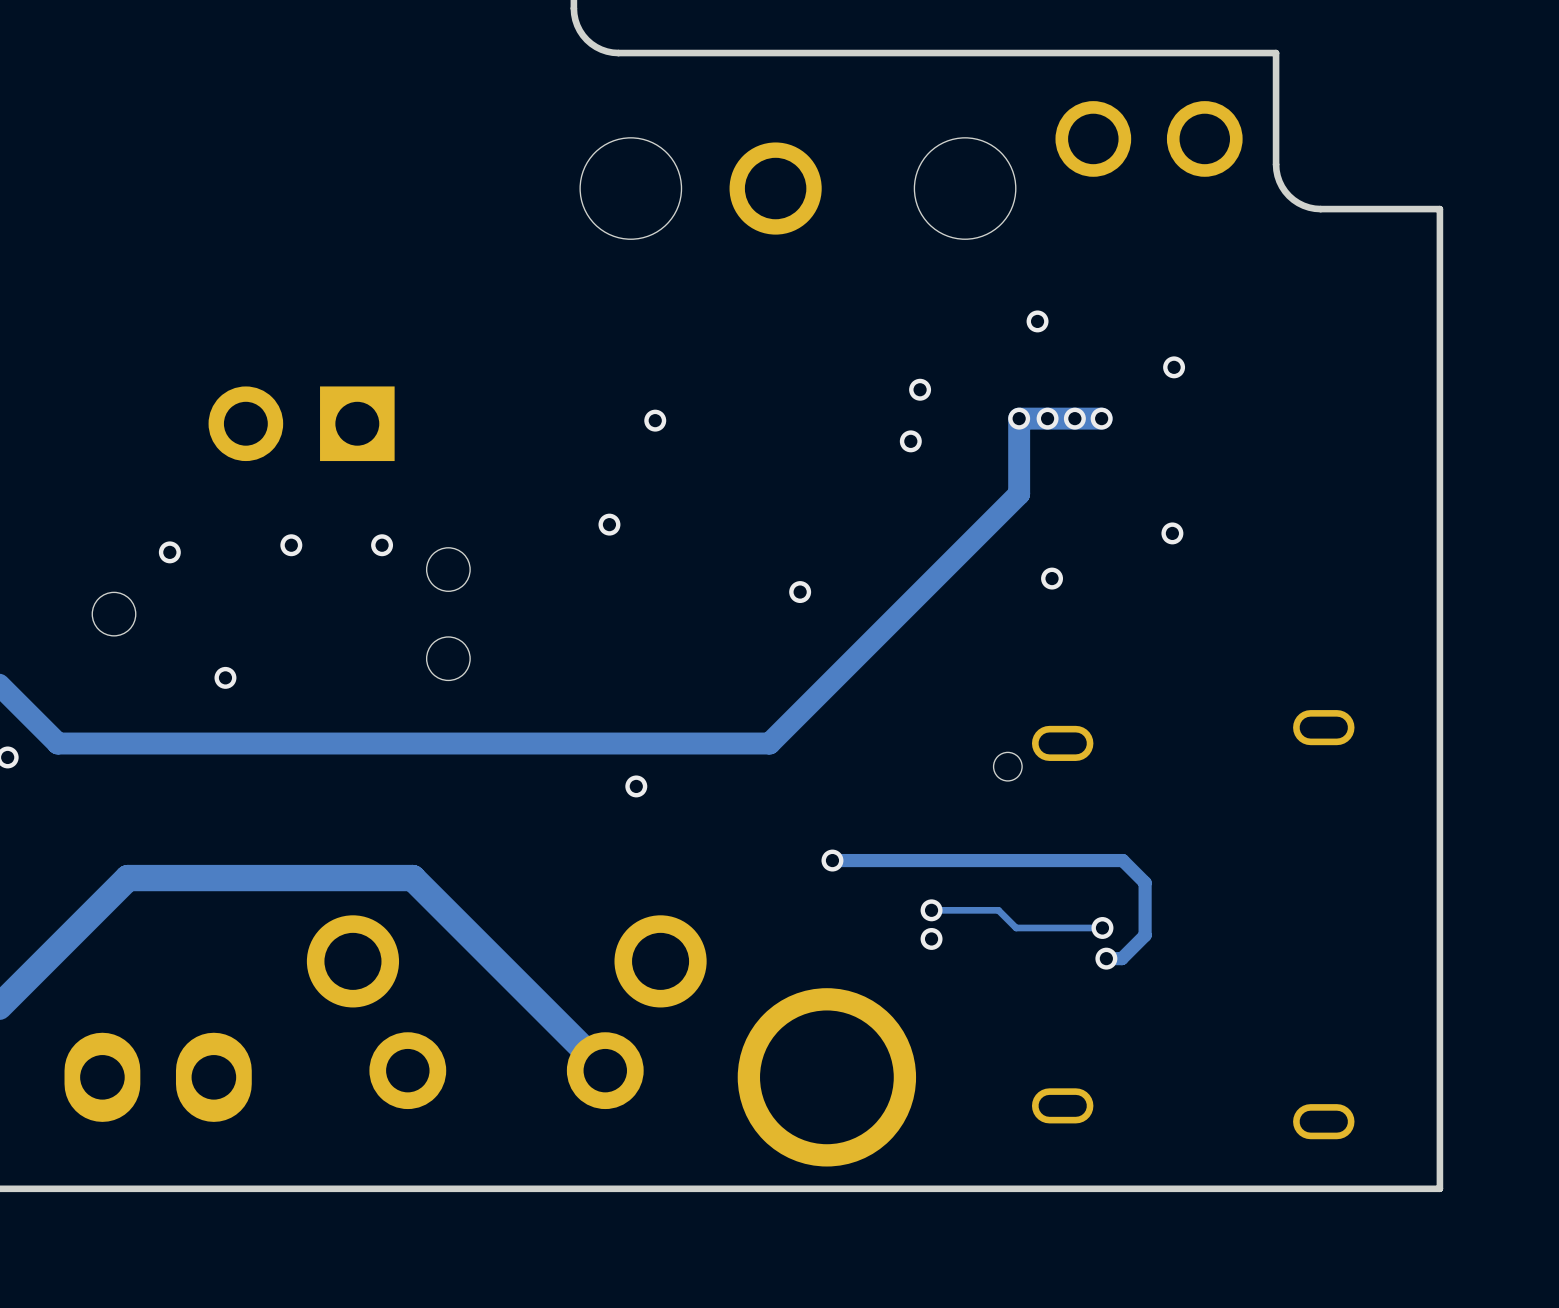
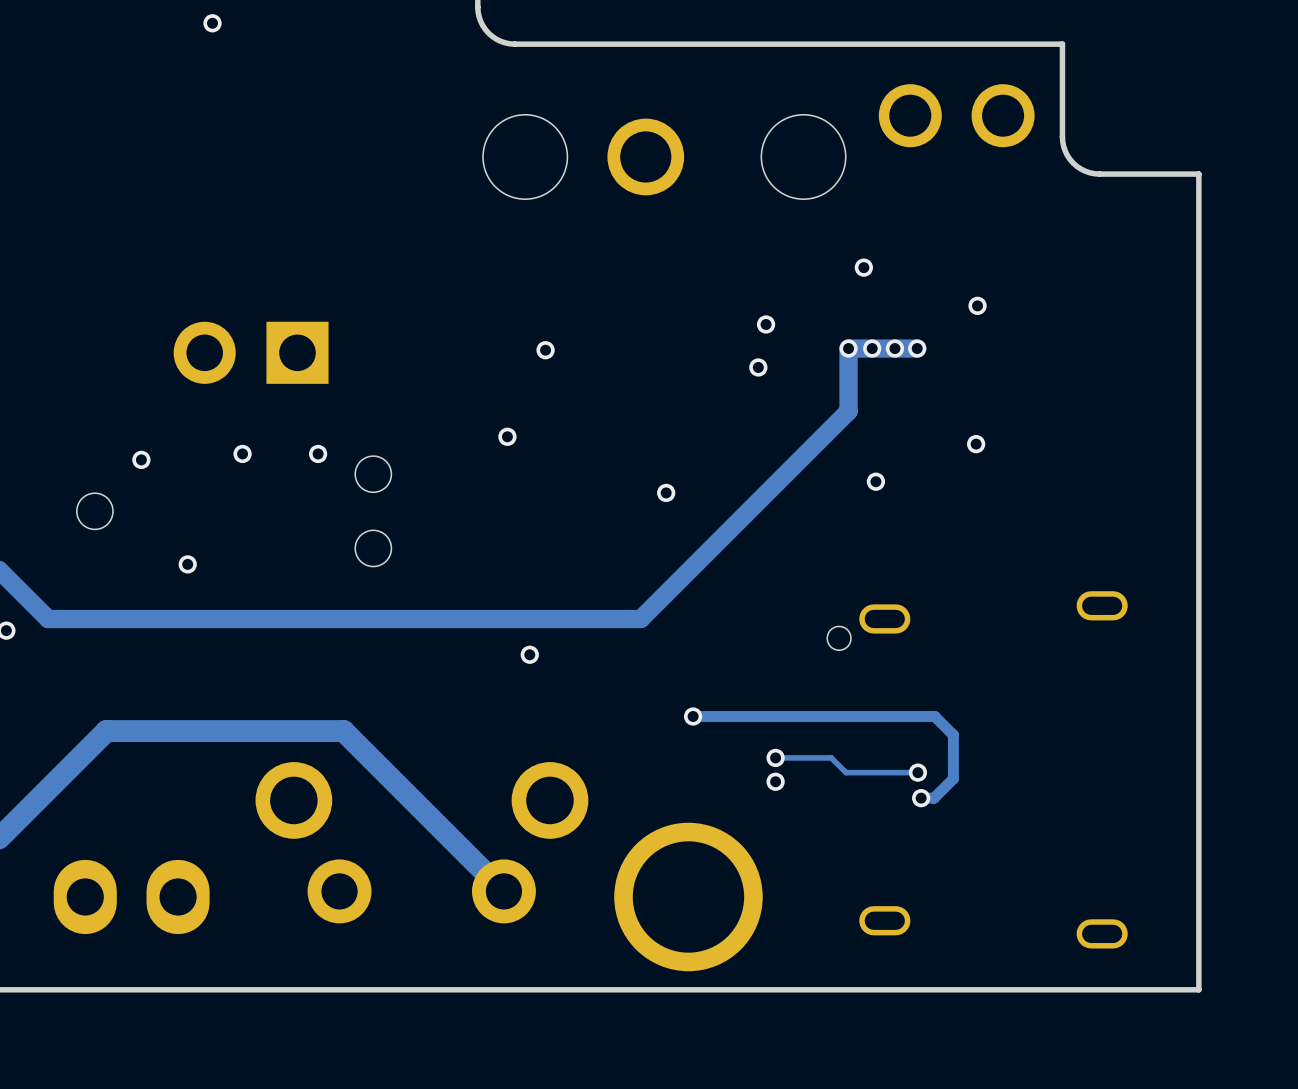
via: none -> (212, 23)

